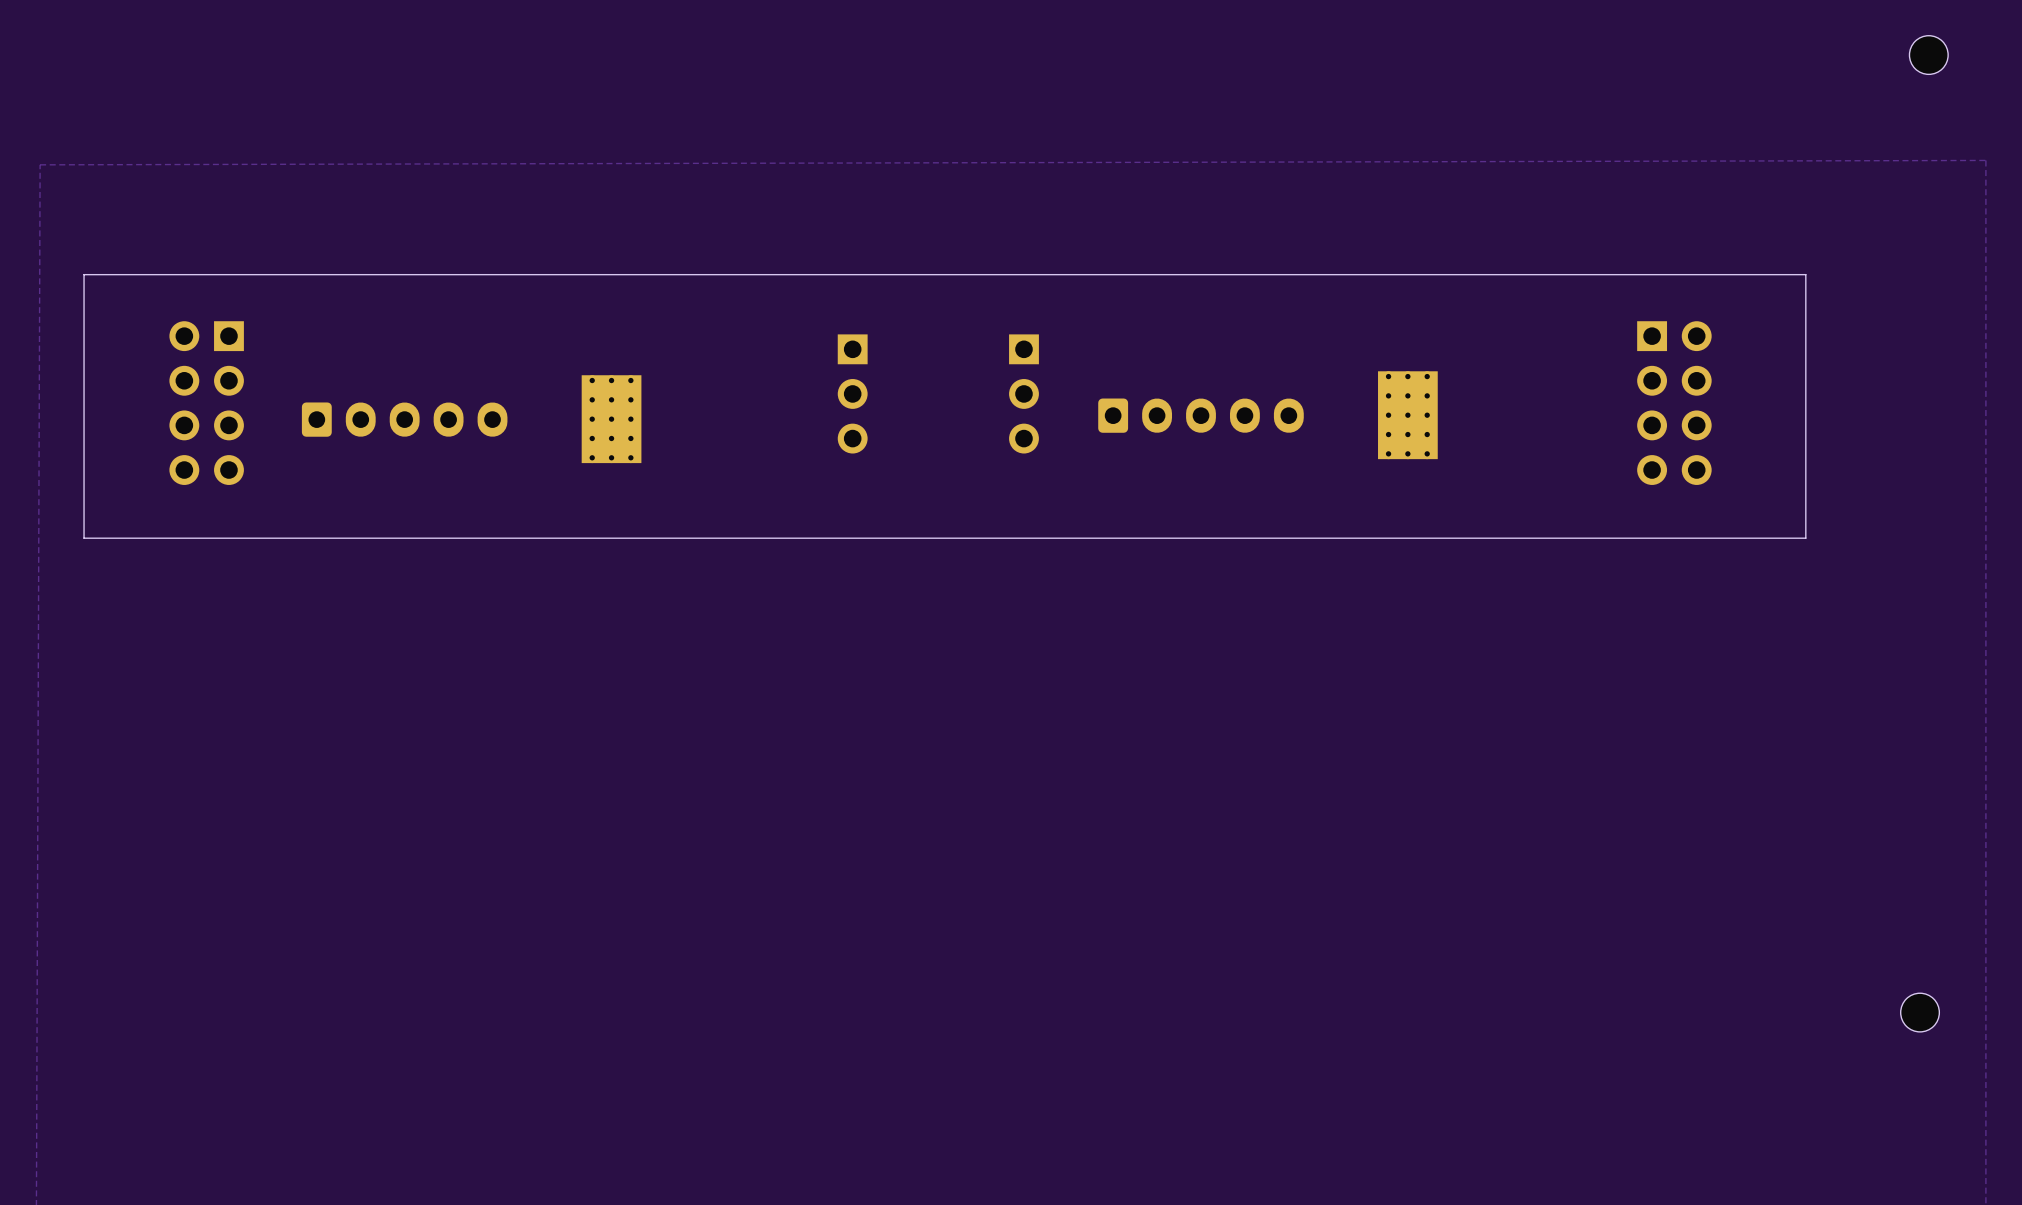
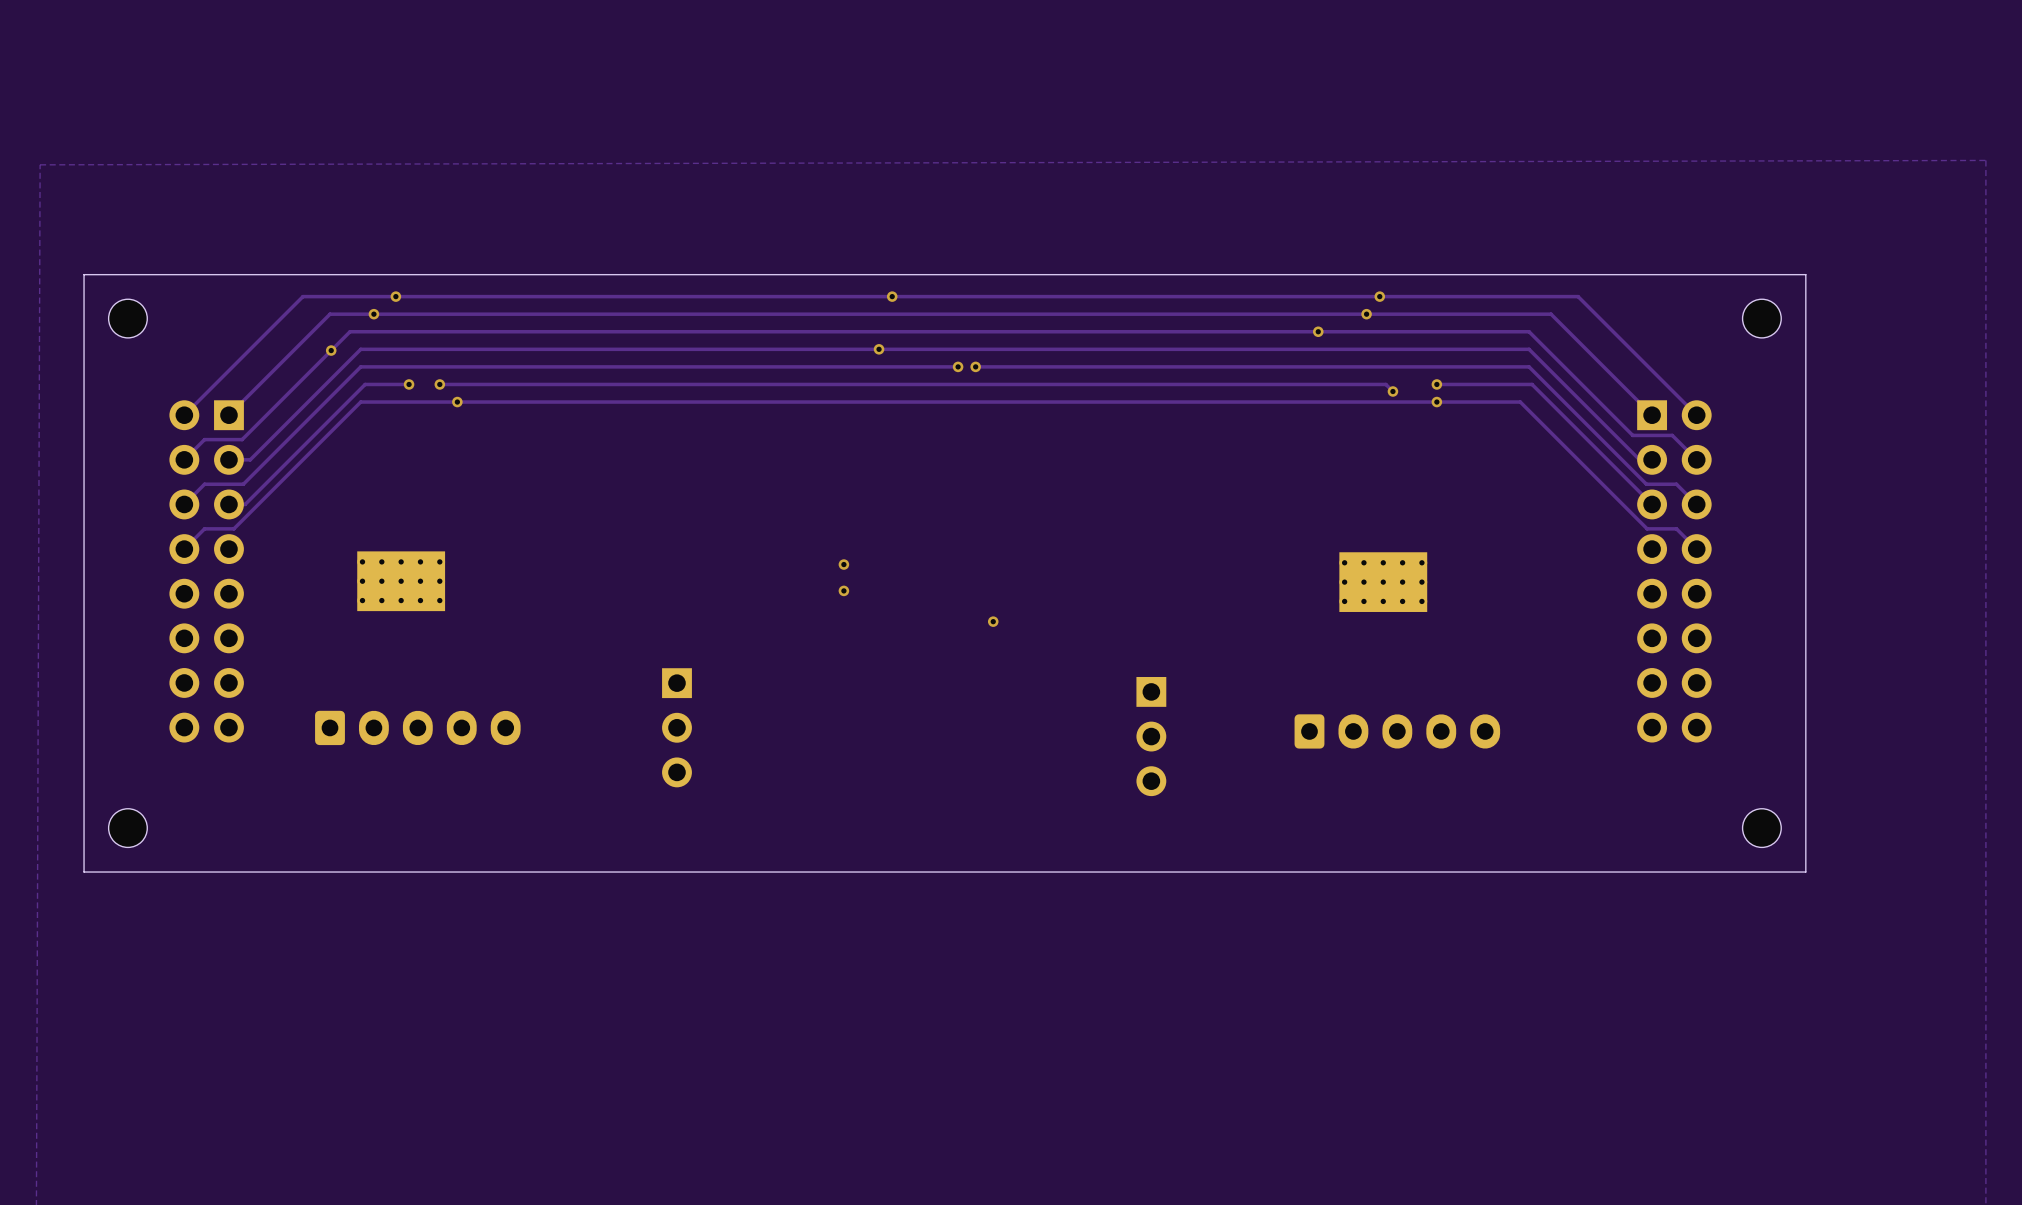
part position: (1928, 55) -> (1761, 318)
via: none -> (395, 296)
via: none -> (892, 296)
via: none -> (1379, 296)
via: none -> (373, 314)
via: none -> (1366, 314)
part: none -> (127, 318)
via: none -> (1318, 331)
via: none -> (879, 349)
via: none -> (331, 350)
track: none -> (958, 366) (360, 366) (243, 484) (204, 484) (184, 504)
via: none -> (958, 366)
track: none -> (975, 366) (1529, 366) (1646, 484) (1676, 484) (1696, 504)
via: none -> (975, 366)
track: none -> (409, 384) (365, 384) (245, 504) (228, 504)
via: none -> (409, 384)
track: none -> (439, 384) (1385, 384) (1392, 391)
via: none -> (439, 384)
track: none -> (1436, 384) (1532, 384) (1652, 504)
via: none -> (1436, 384)
via: none -> (1392, 391)
part: (852, 393) -> none
part: (1023, 393) -> none
via: none -> (457, 402)
via: none -> (1436, 402)
part: (206, 403) -> none
part: (1674, 403) -> none
part position: (1201, 415) -> (1397, 731)
part rotation: 0° (1407, 415) -> 90° clockwise (1383, 582)
part position: (1407, 415) -> (1383, 582)
track: none -> (1652, 415) (1551, 314) (330, 314) (228, 415)
track: none -> (1696, 415) (1578, 296) (302, 296) (184, 415)
part position: (404, 419) -> (417, 727)
part rotation: 0° (611, 419) -> 90° clockwise (401, 581)
part position: (611, 419) -> (401, 581)
track: none -> (1652, 459) (1639, 459) (1529, 349) (360, 349) (250, 459) (228, 459)
track: none -> (1696, 459) (1672, 435) (1632, 435) (1529, 331) (350, 331) (242, 439) (204, 439) (184, 459)
board edge: (1805, 538) (84, 538) -> (1805, 538) (1805, 872) (84, 872) (84, 538)
track: none -> (1696, 549) (1676, 528) (1647, 528) (1520, 402) (360, 402) (233, 528) (204, 528) (184, 549)
via: none -> (843, 564)
part: none -> (206, 571)
part: none -> (1674, 571)
via: none -> (843, 590)
via: none -> (993, 621)
part: none -> (676, 727)
part: none -> (1151, 736)
part: none -> (127, 828)
part position: (1920, 1012) -> (1761, 828)

